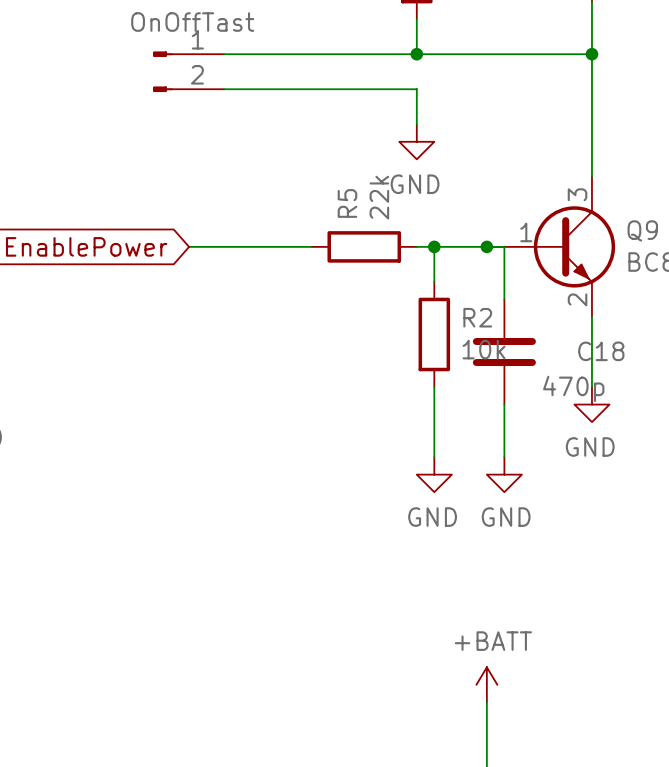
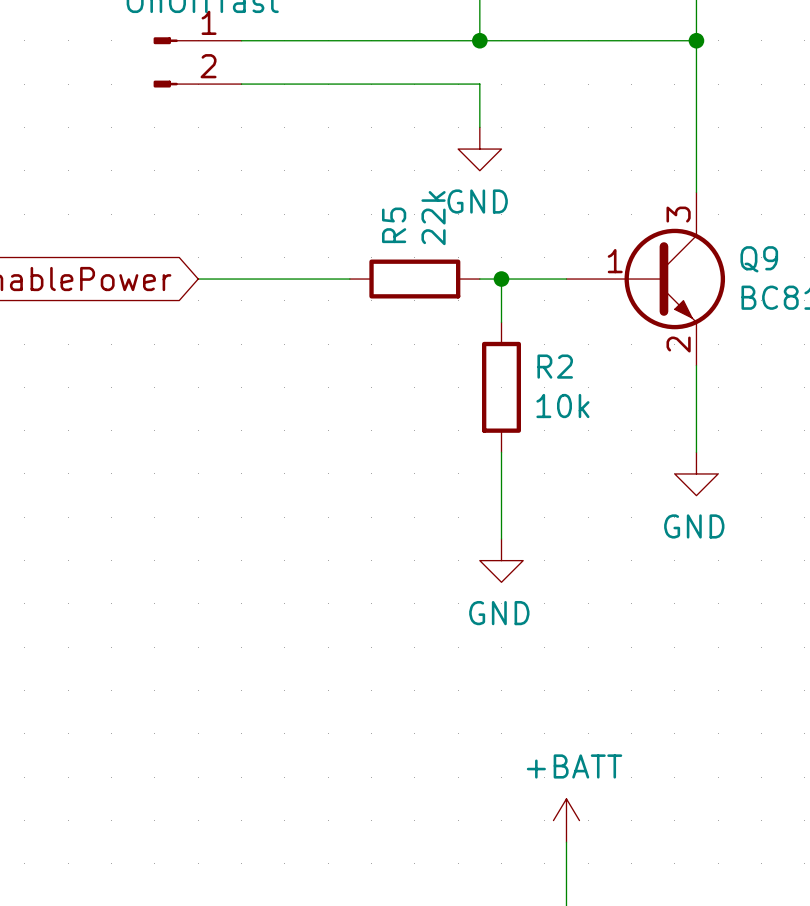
wire: (486, 246) (504, 246) (504, 299) -> none
junction: (486, 246) -> none
C18: 470p (504, 352) -> none
wire: (504, 404) (504, 457) -> none
power symbol: GND (504, 474) -> none

